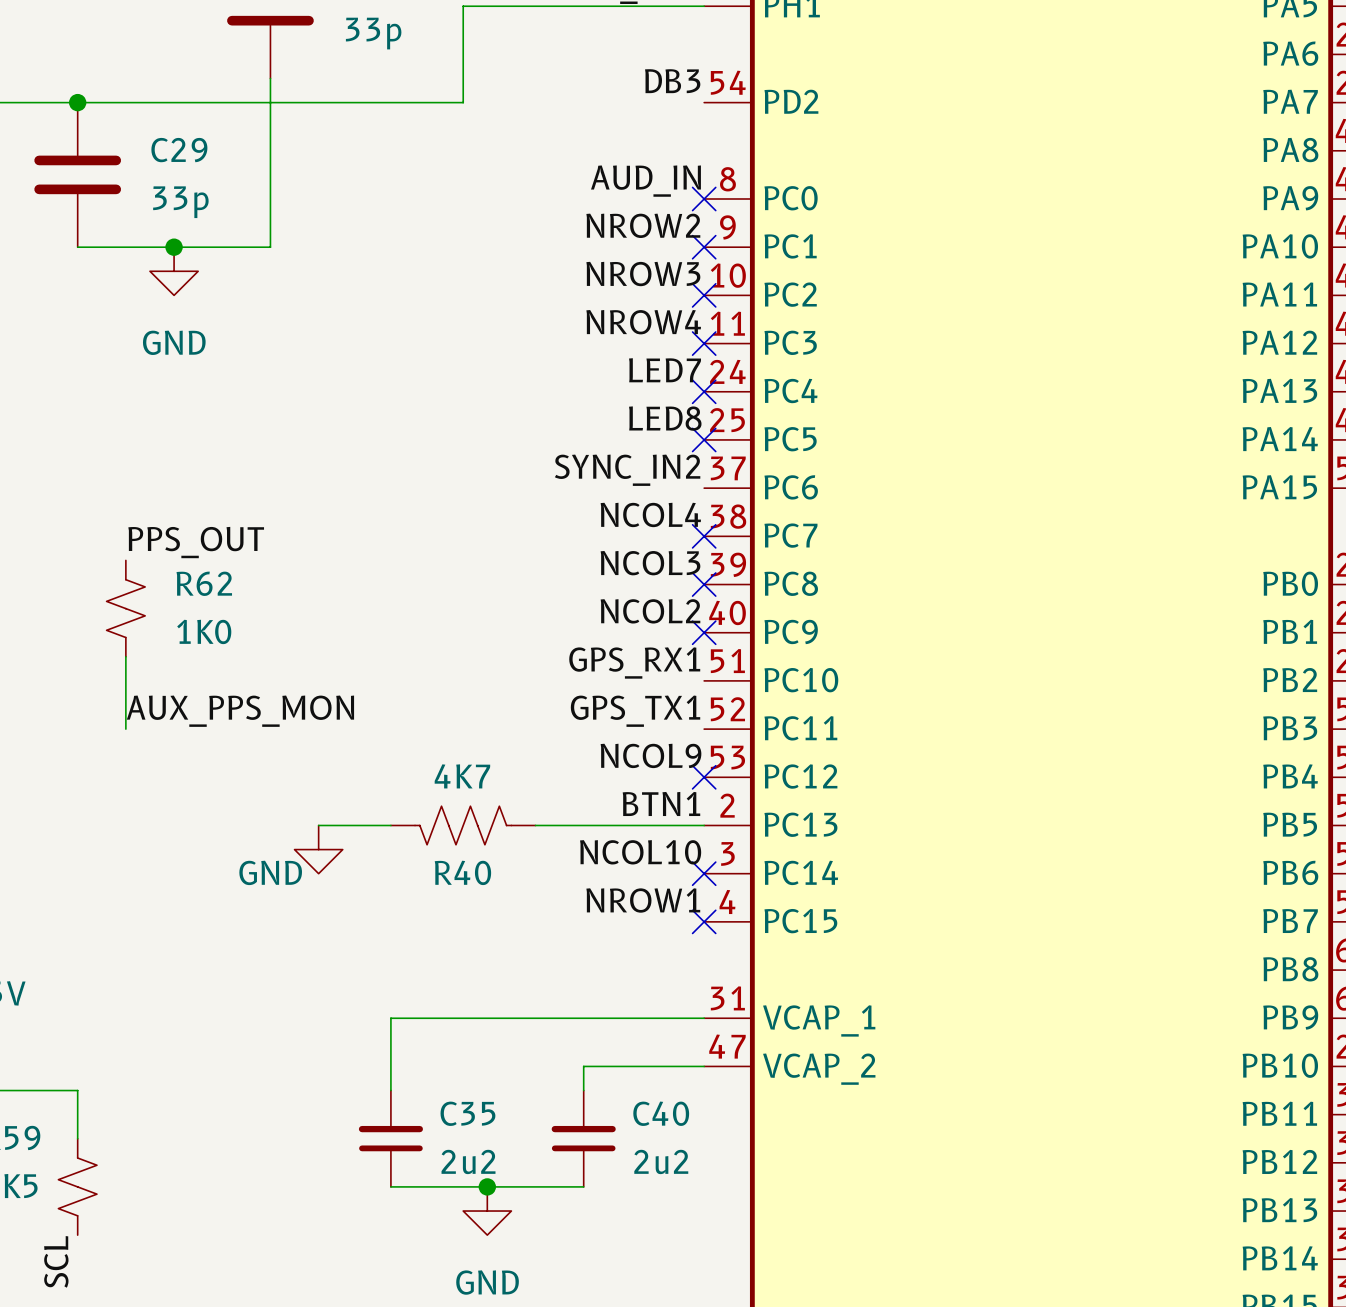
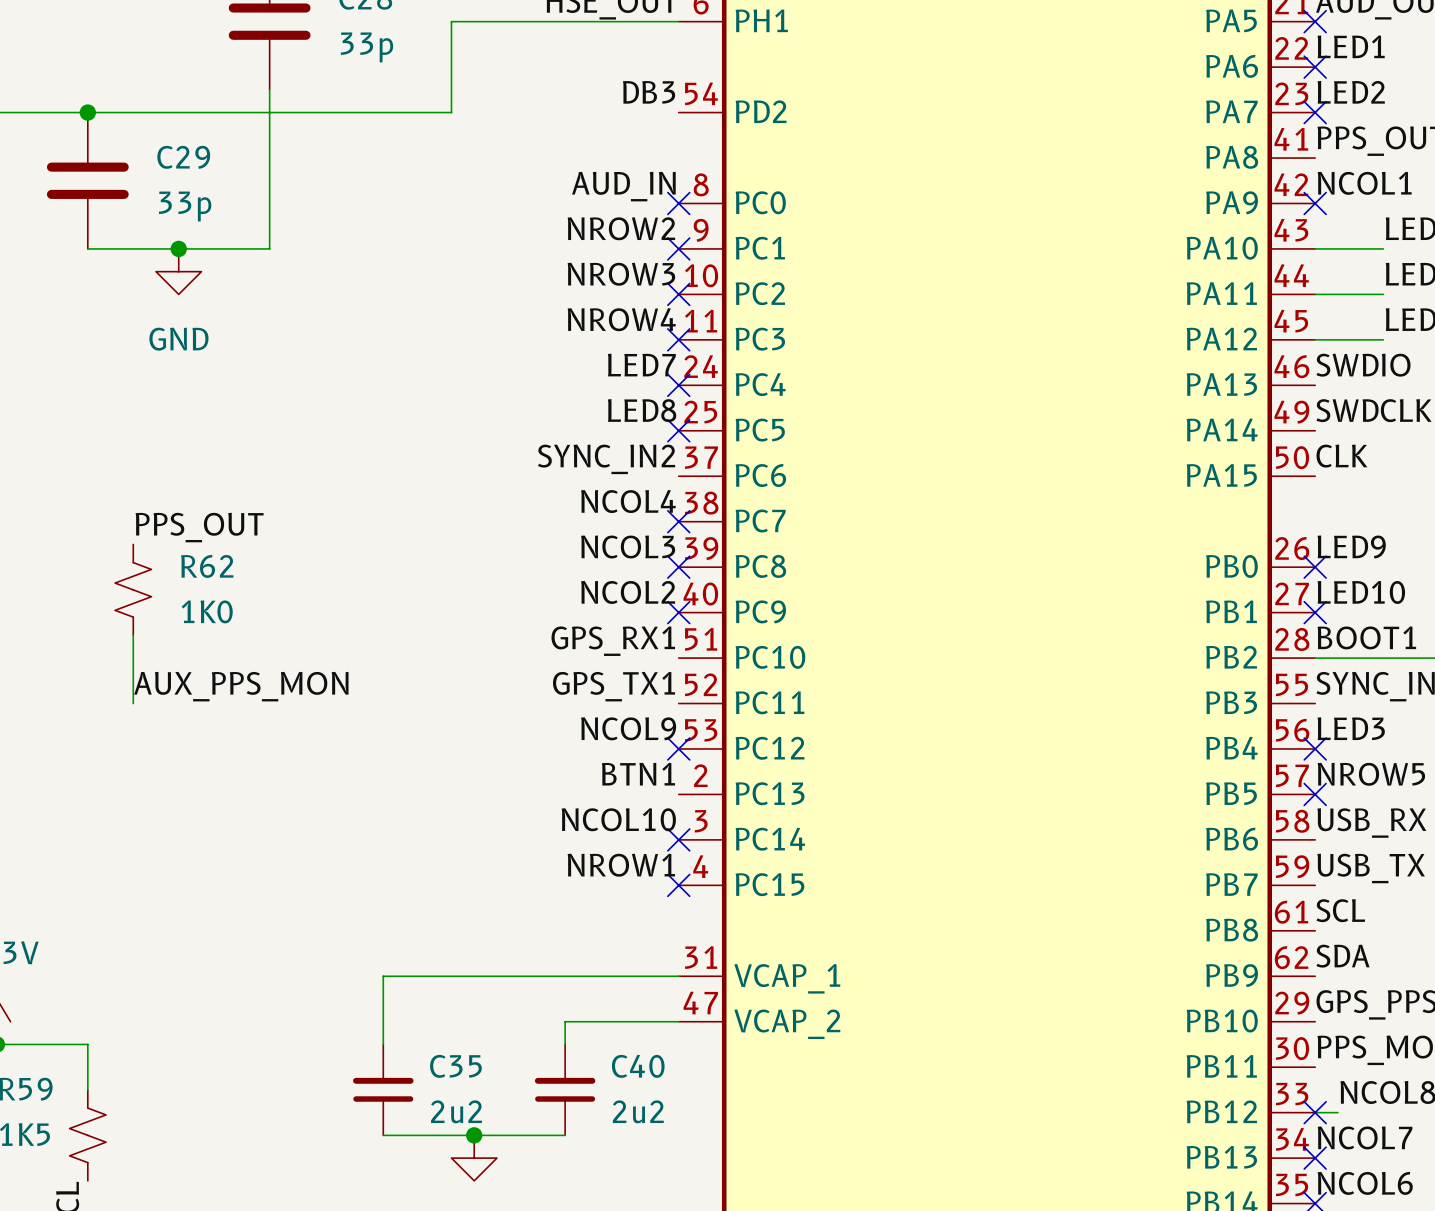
wire: (318, 825) (390, 825) -> none
R40: 4K7 (463, 825) -> none
wire: (535, 825) (704, 825) -> none
power symbol: GND (318, 849) -> none

